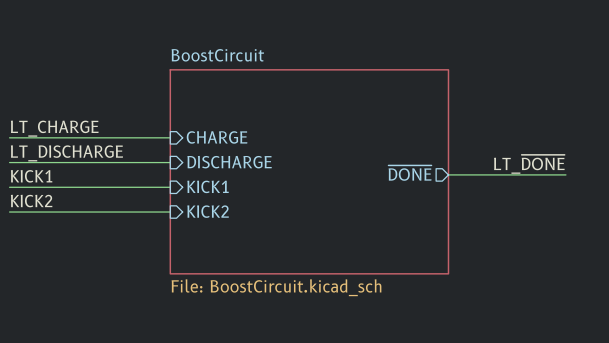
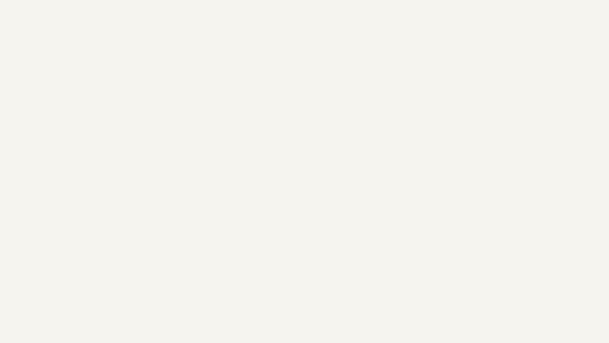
label: LT_CHARGE (54, 128) -> none
wire: (9, 137) (170, 137) -> none
sheet pin: CHARGE (217, 137) -> none
label: LT_DISCHARGE (66, 153) -> none
wire: (9, 162) (170, 162) -> none
sheet pin: DISCHARGE (229, 162) -> none
label: LT_~{DONE} (529, 164) -> none
sheet BoostCircuit: File: BoostCircuit.kicad_sch (309, 171) -> none
sheet pin: ~{DONE} (410, 173) -> none
wire: (448, 174) (565, 174) -> none
label: KICK1 (31, 176) -> none
sheet pin: KICK1 (208, 186) -> none
wire: (9, 187) (170, 187) -> none
label: KICK2 (31, 201) -> none
sheet pin: KICK2 (208, 211) -> none
wire: (9, 212) (170, 212) -> none

